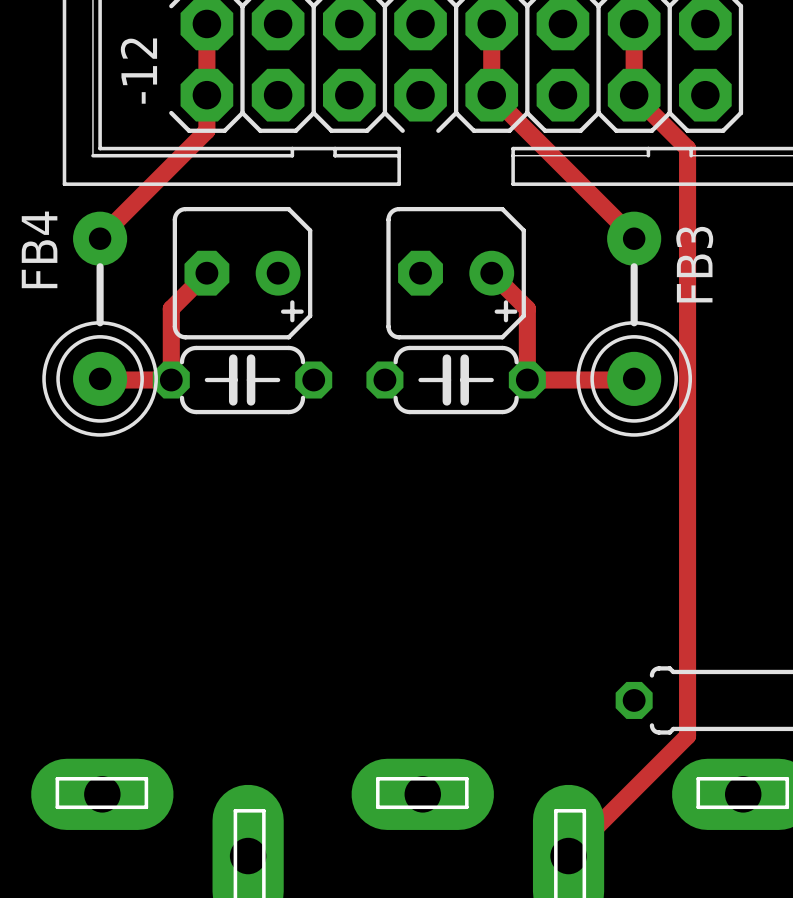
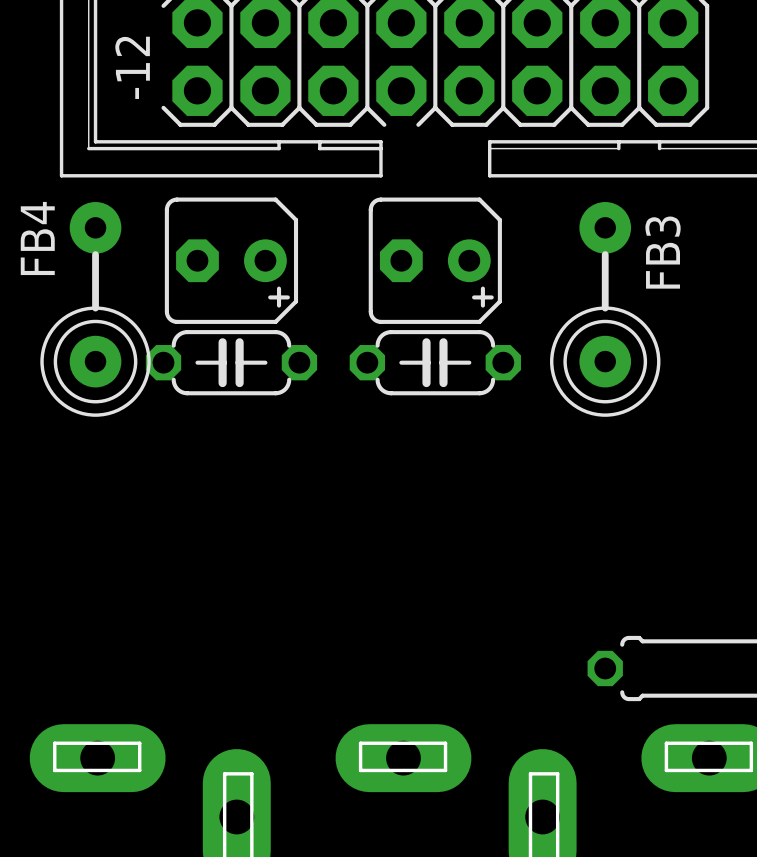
track: (206, 23) (206, 130) (100, 238) -> none
track: (491, 23) (491, 95) (634, 238) -> none
track: (634, 23) (634, 95) (687, 148) (687, 736) (568, 856) -> none
track: (206, 273) (171, 308) (171, 380) (100, 378) -> none
track: (491, 273) (527, 308) (527, 380) (634, 378) -> none

